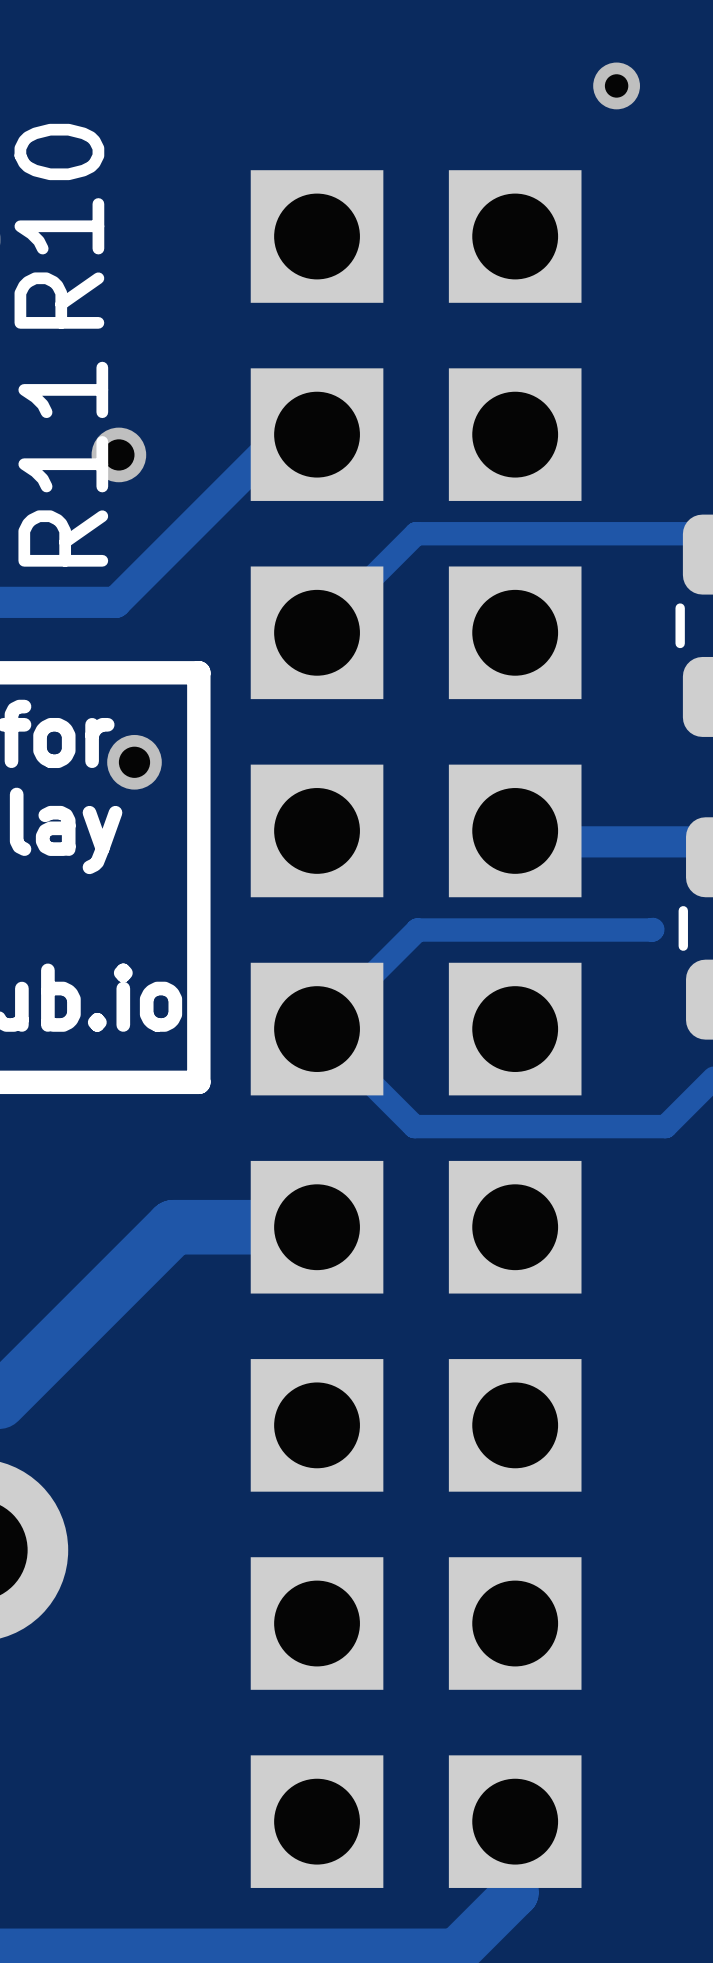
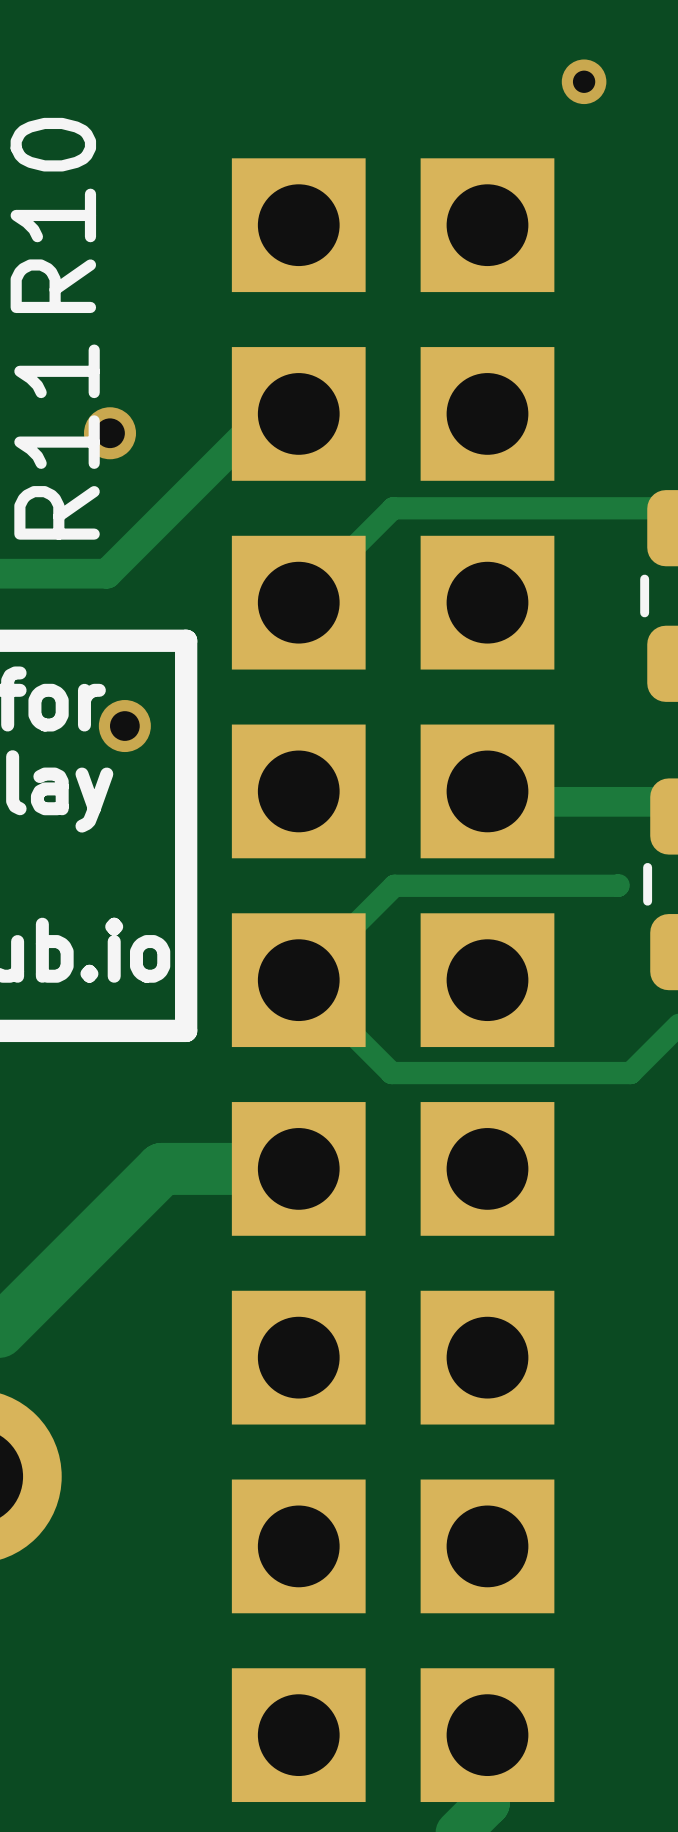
part footprint: [250, 170, 582, 1888] -> [231, 158, 555, 1803]

